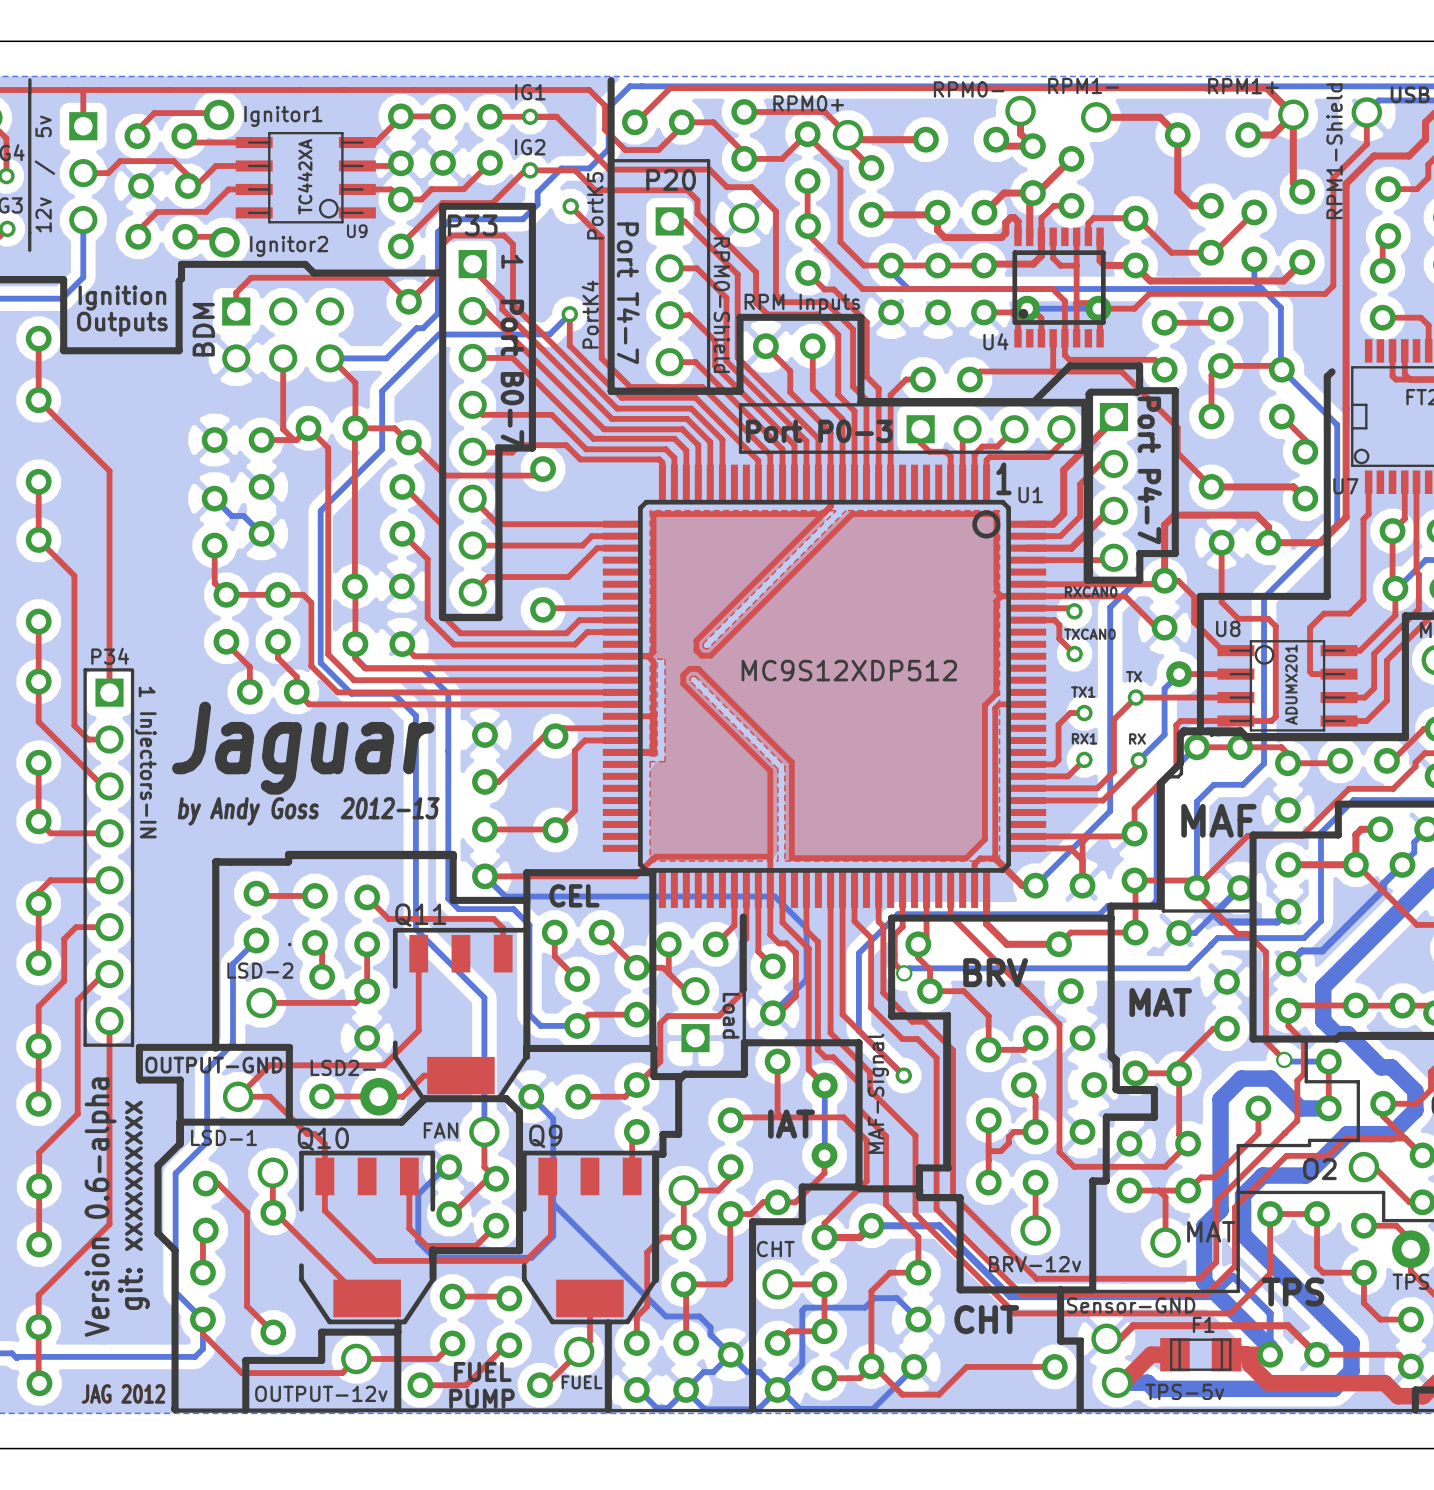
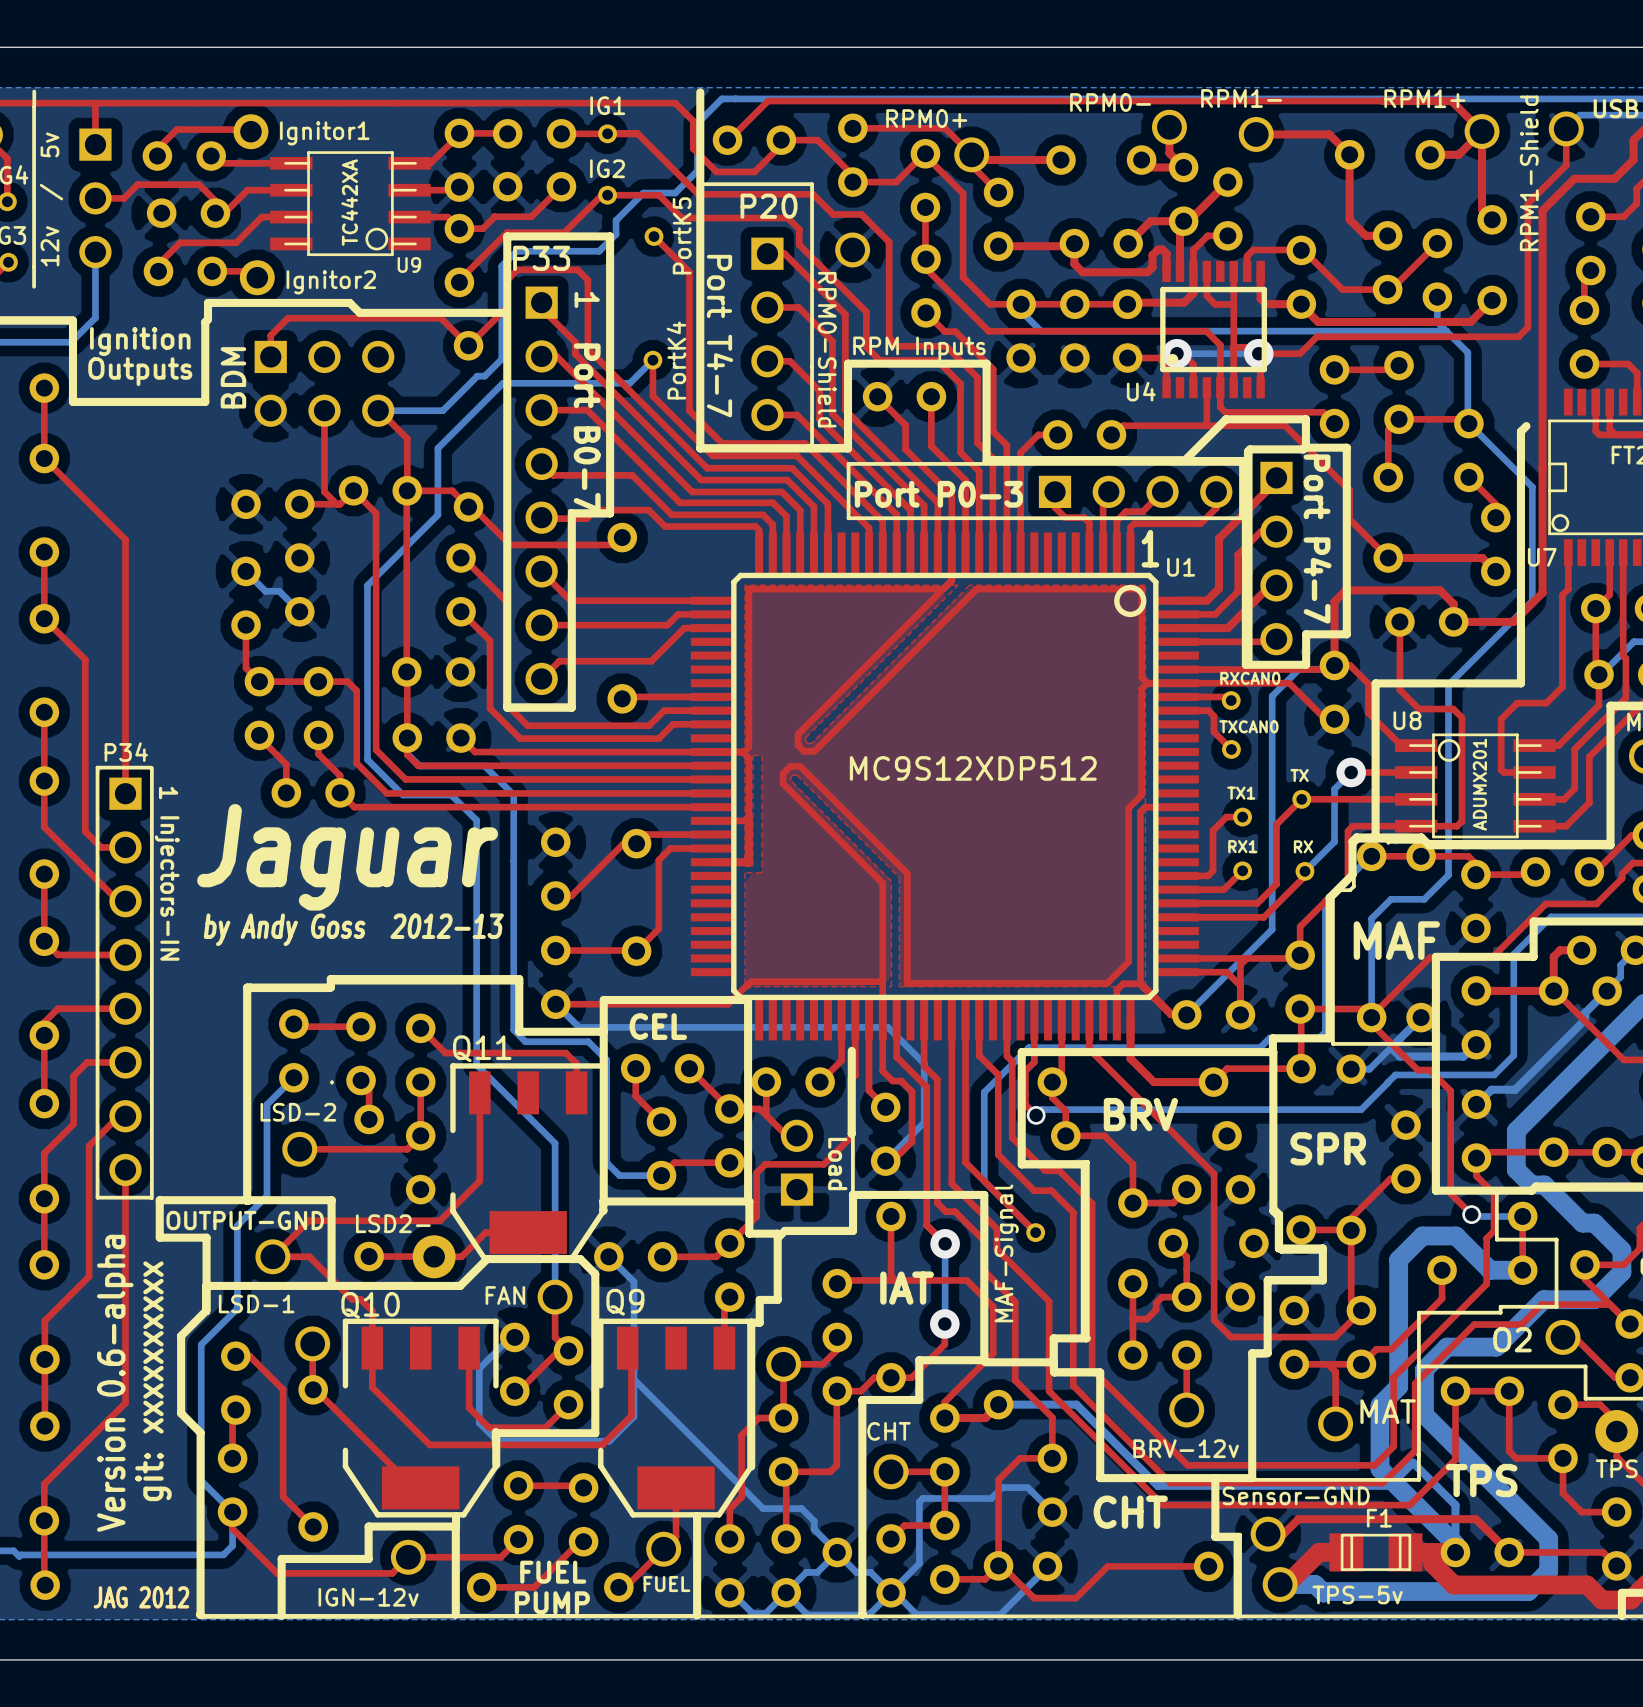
text: MAT (1160, 1002) -> SPR (1328, 1148)
text: OUTPUT-12v (321, 1393) -> IGN-12v (368, 1597)

